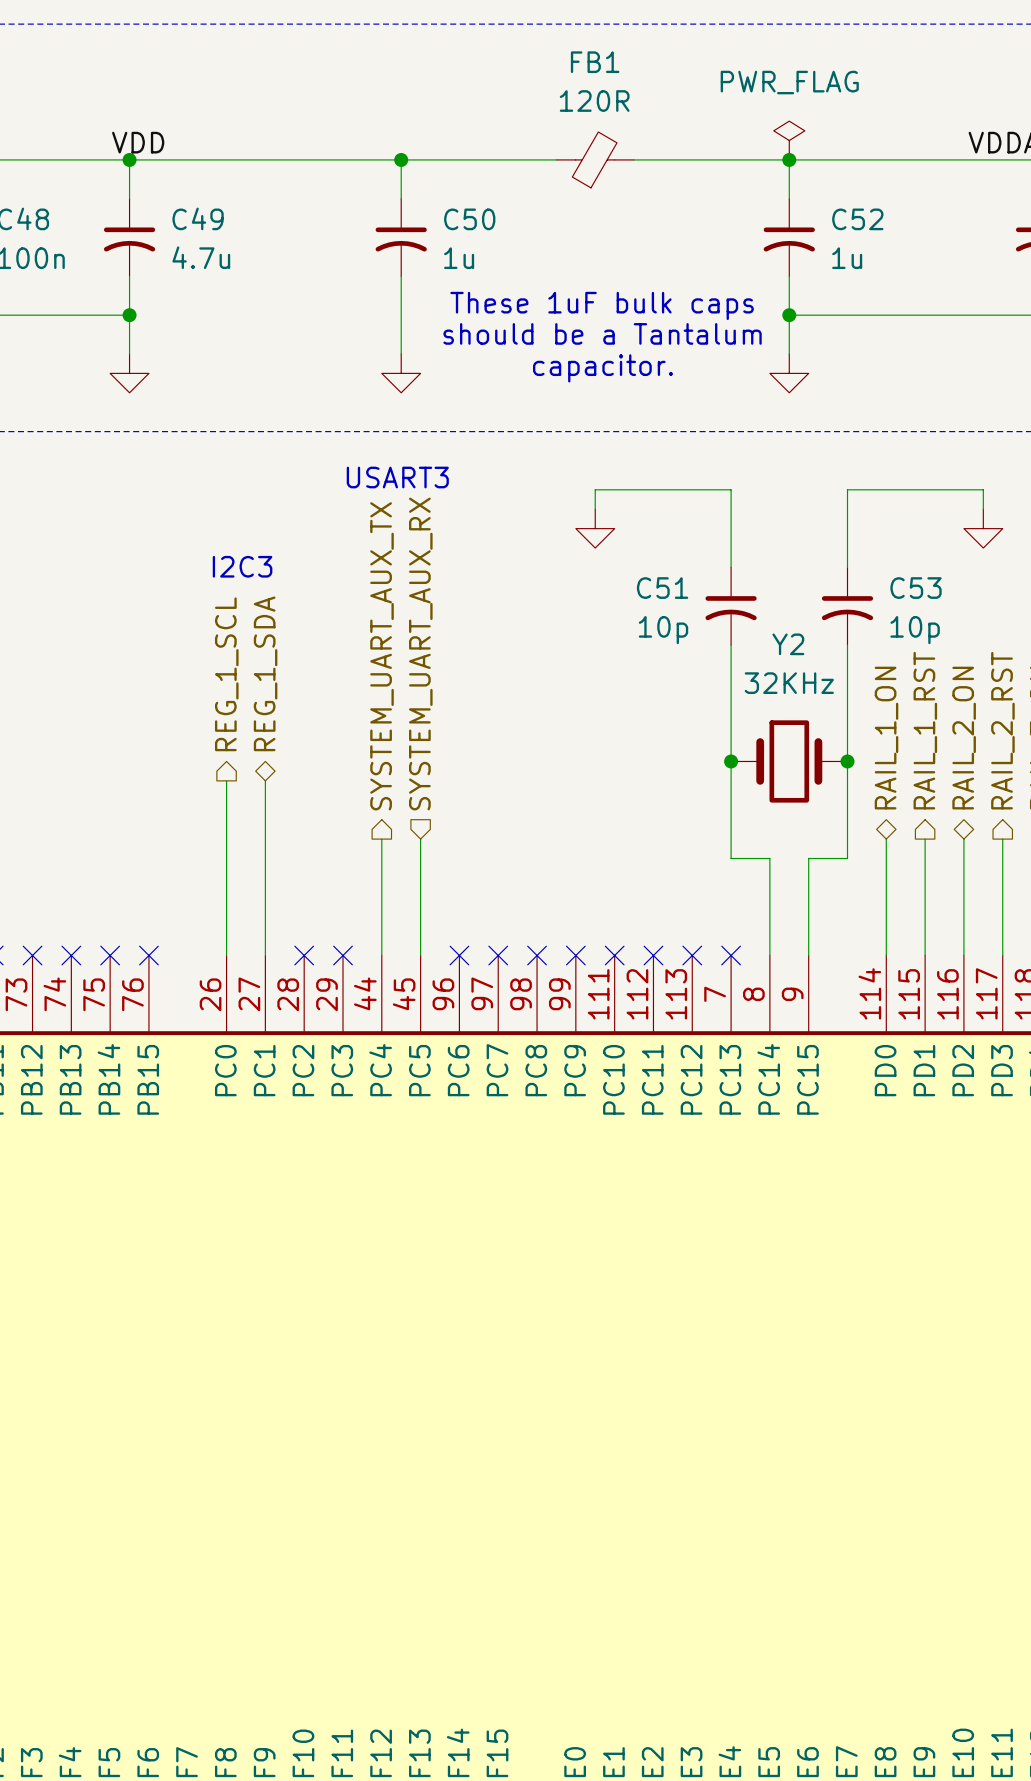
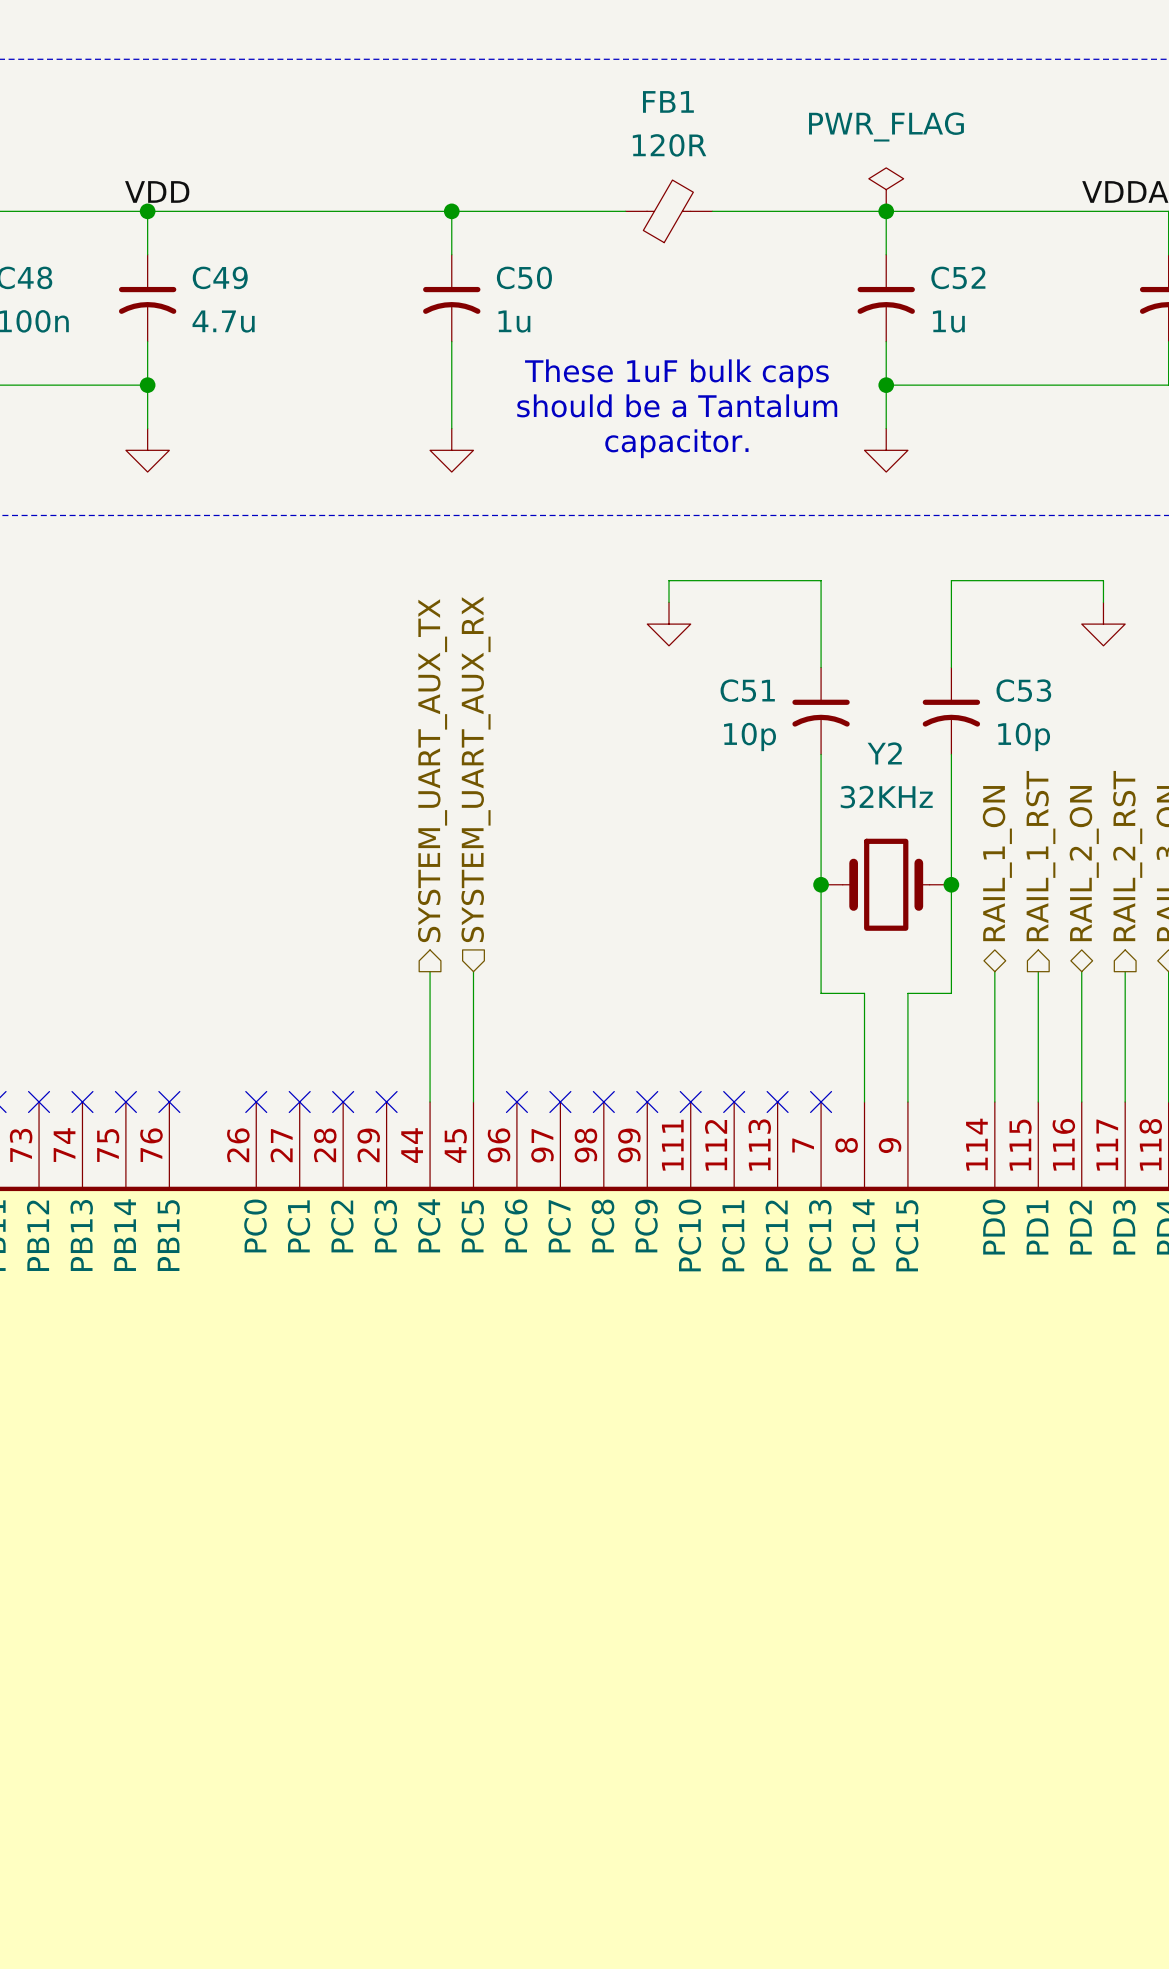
text: USART3 (397, 477) -> none
text: I2C3 (242, 566) -> none
hierarchical label: REG_1_SDA (265, 673) -> none
hierarchical label: REG_1_SCL (226, 674) -> none
wire: (226, 780) (226, 955) -> none
wire: (265, 780) (265, 955) -> none
no-connect mark: none -> (256, 1102)
no-connect mark: none -> (299, 1102)

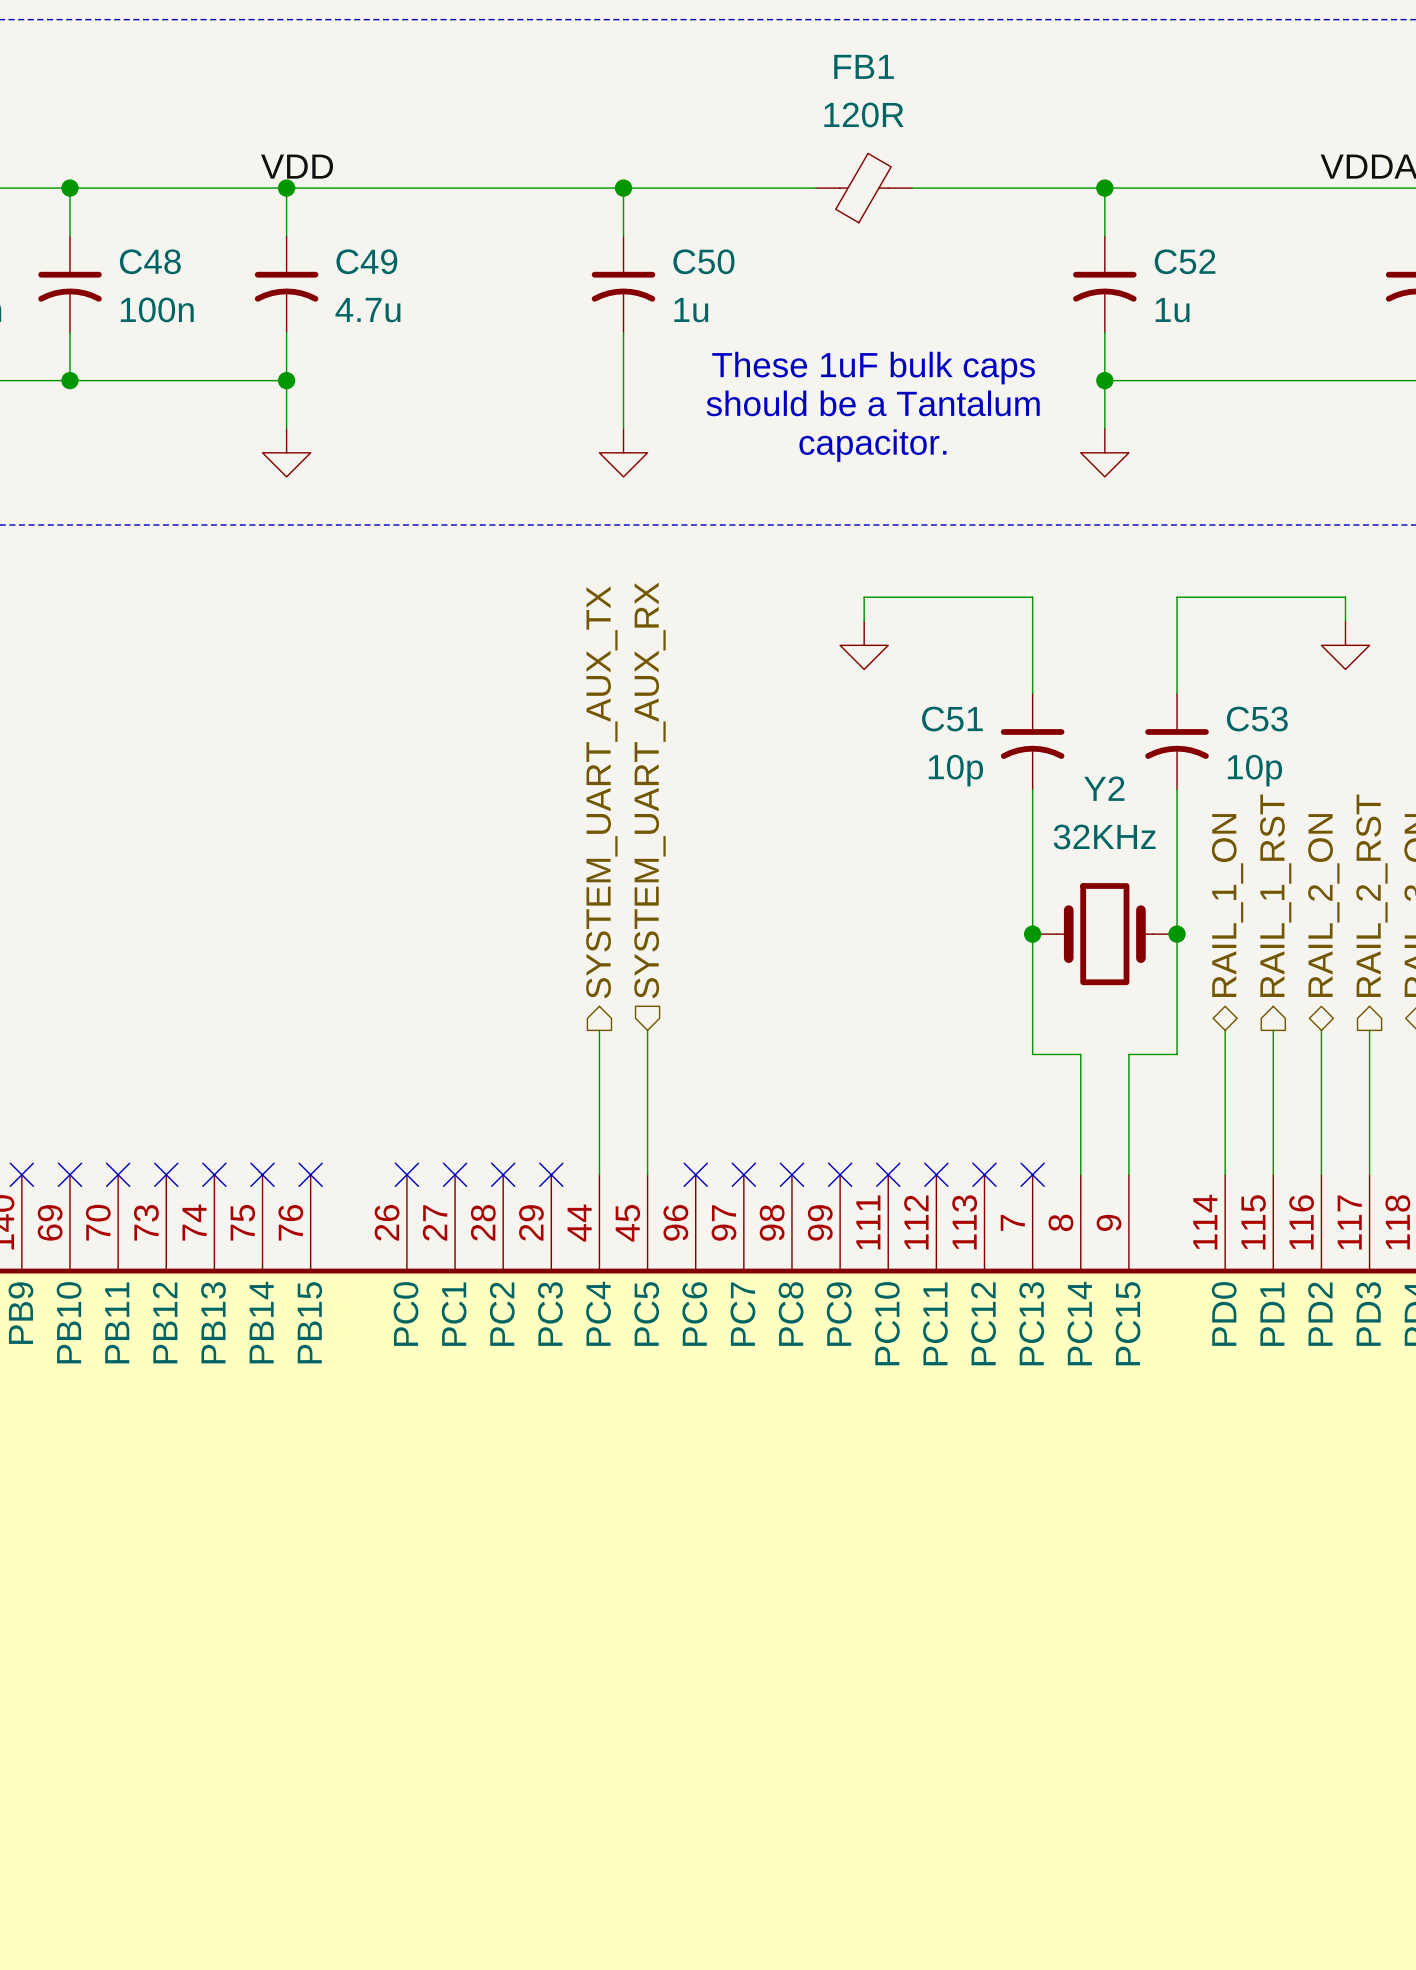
power symbol: PWR_FLAG (886, 189) -> none

